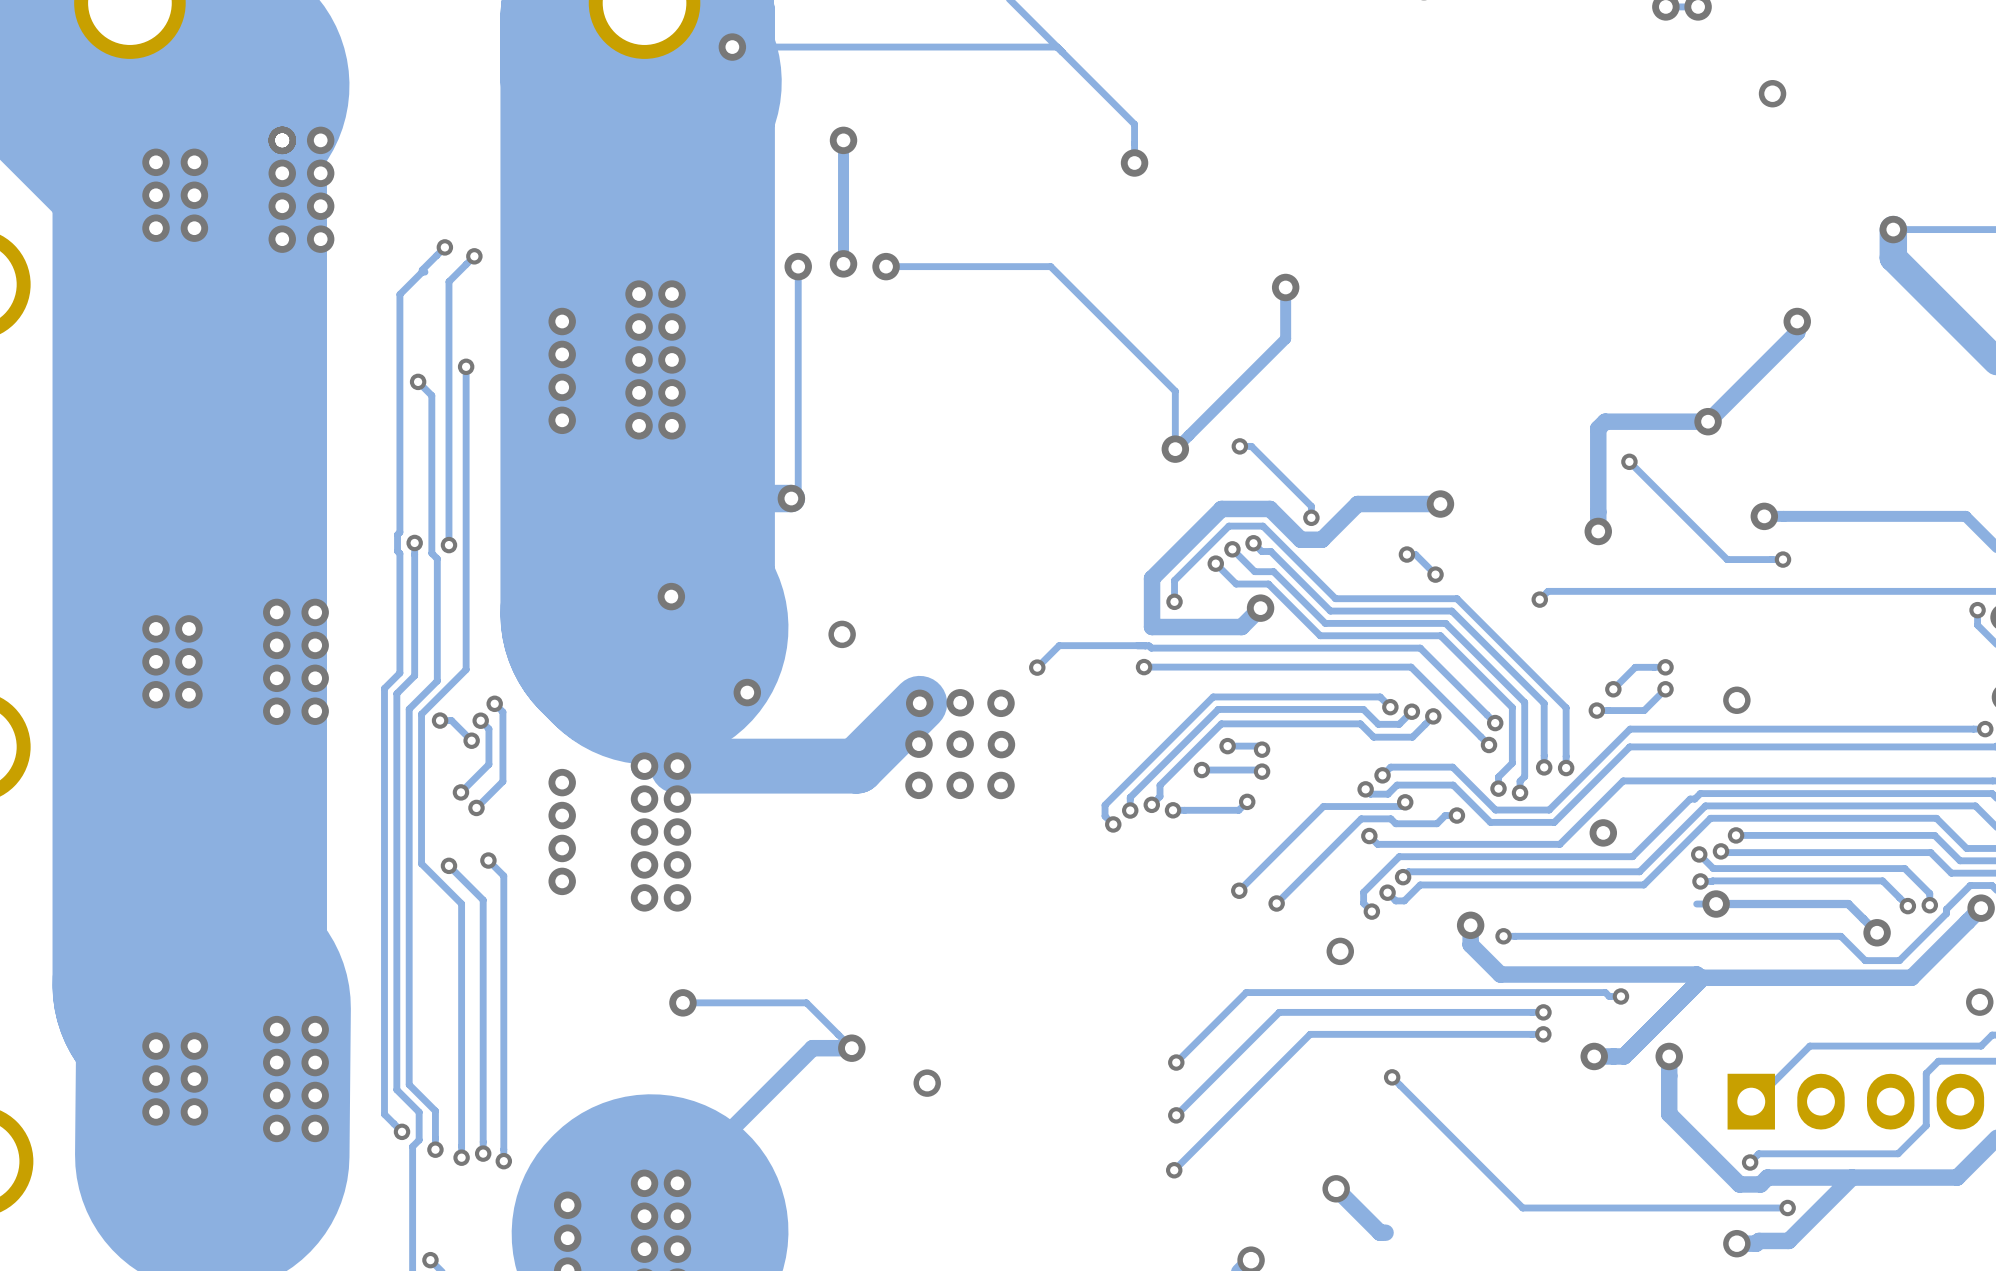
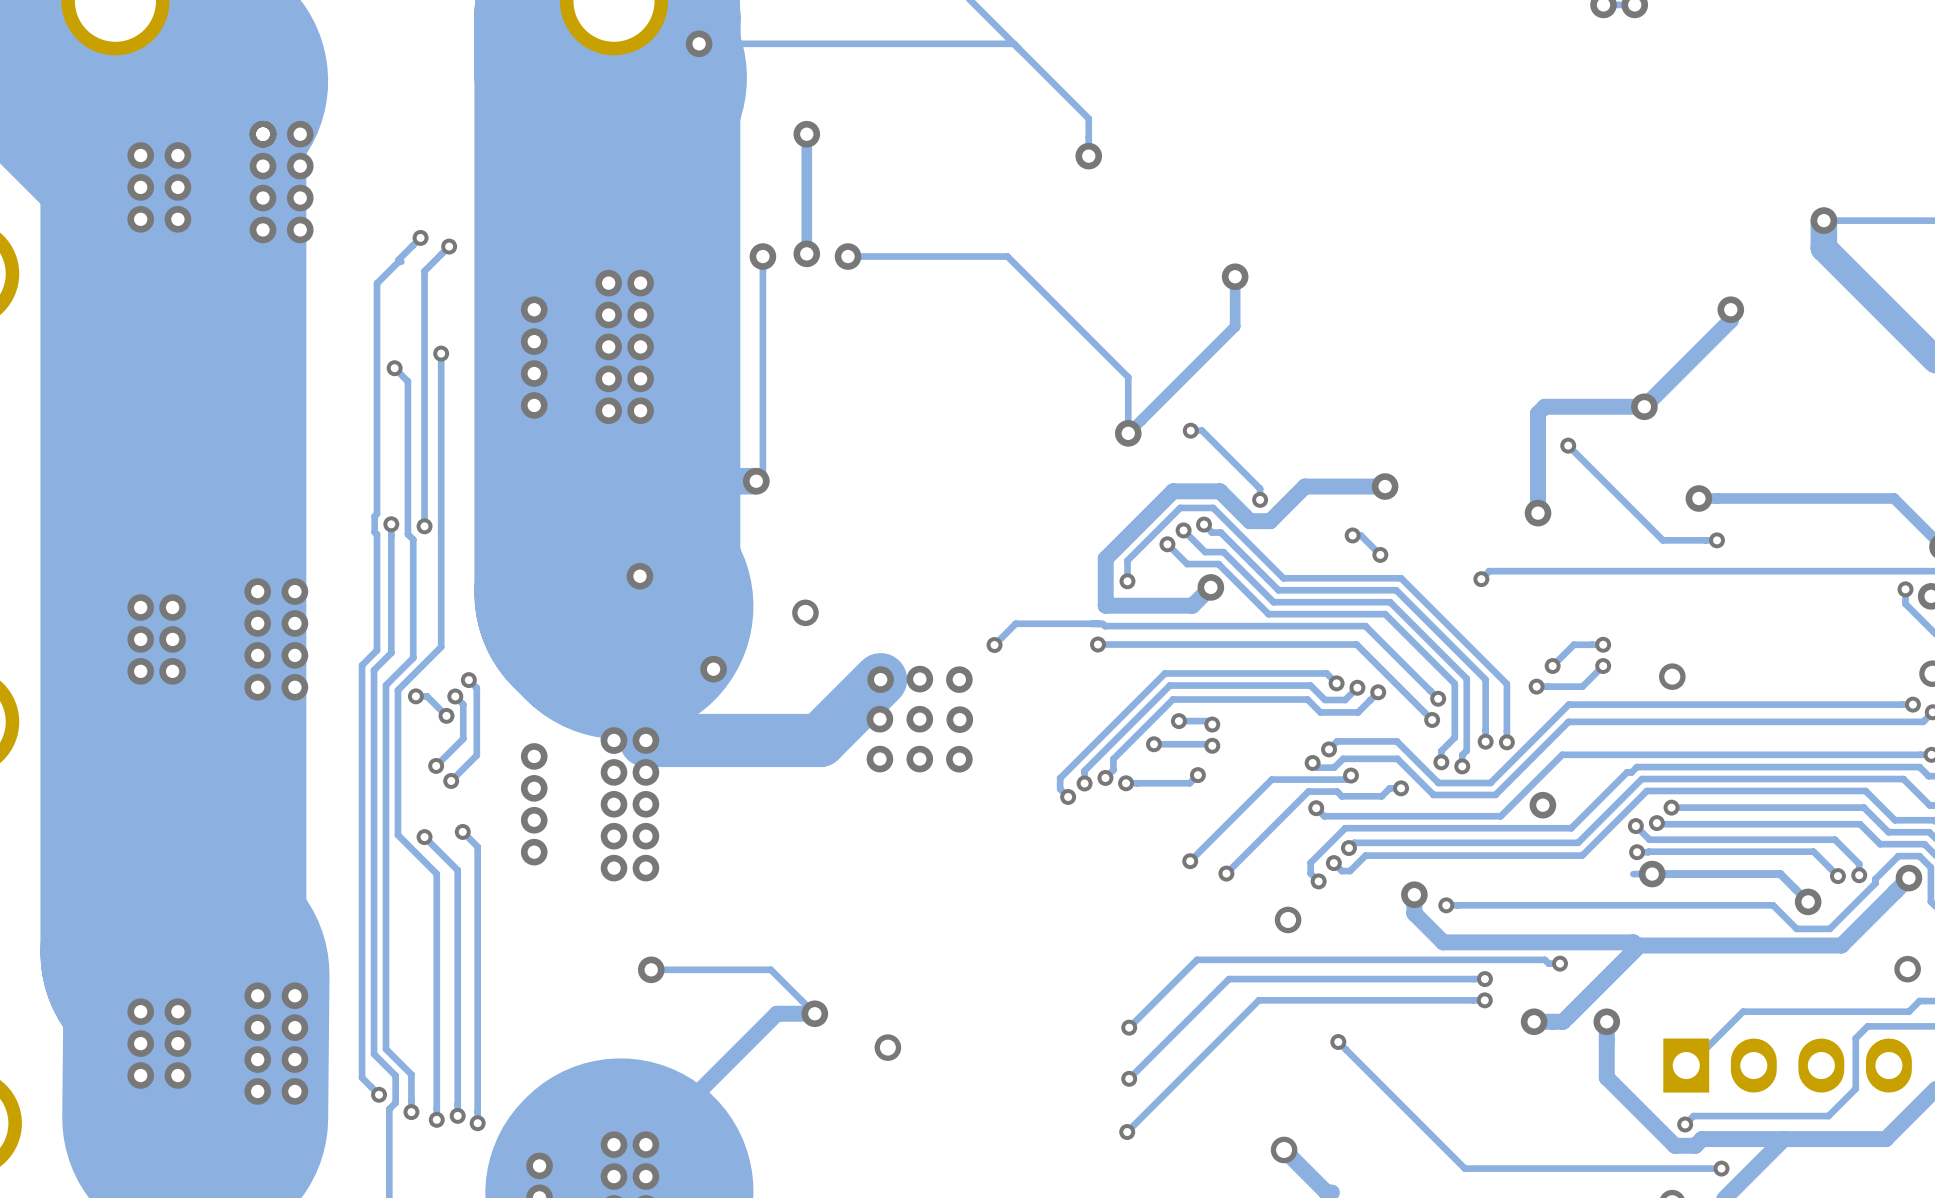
via: (1772, 93) -> none

